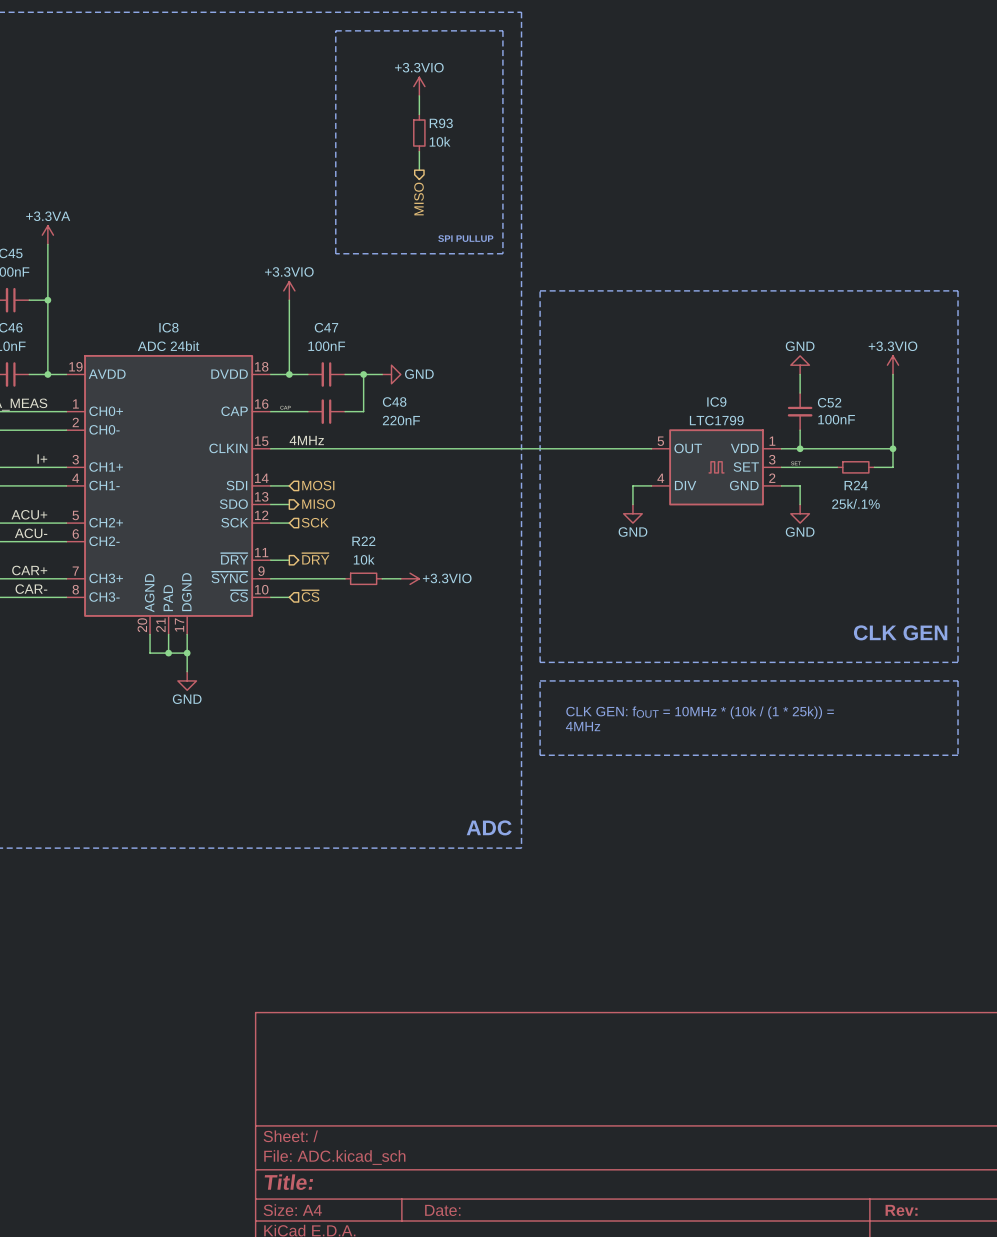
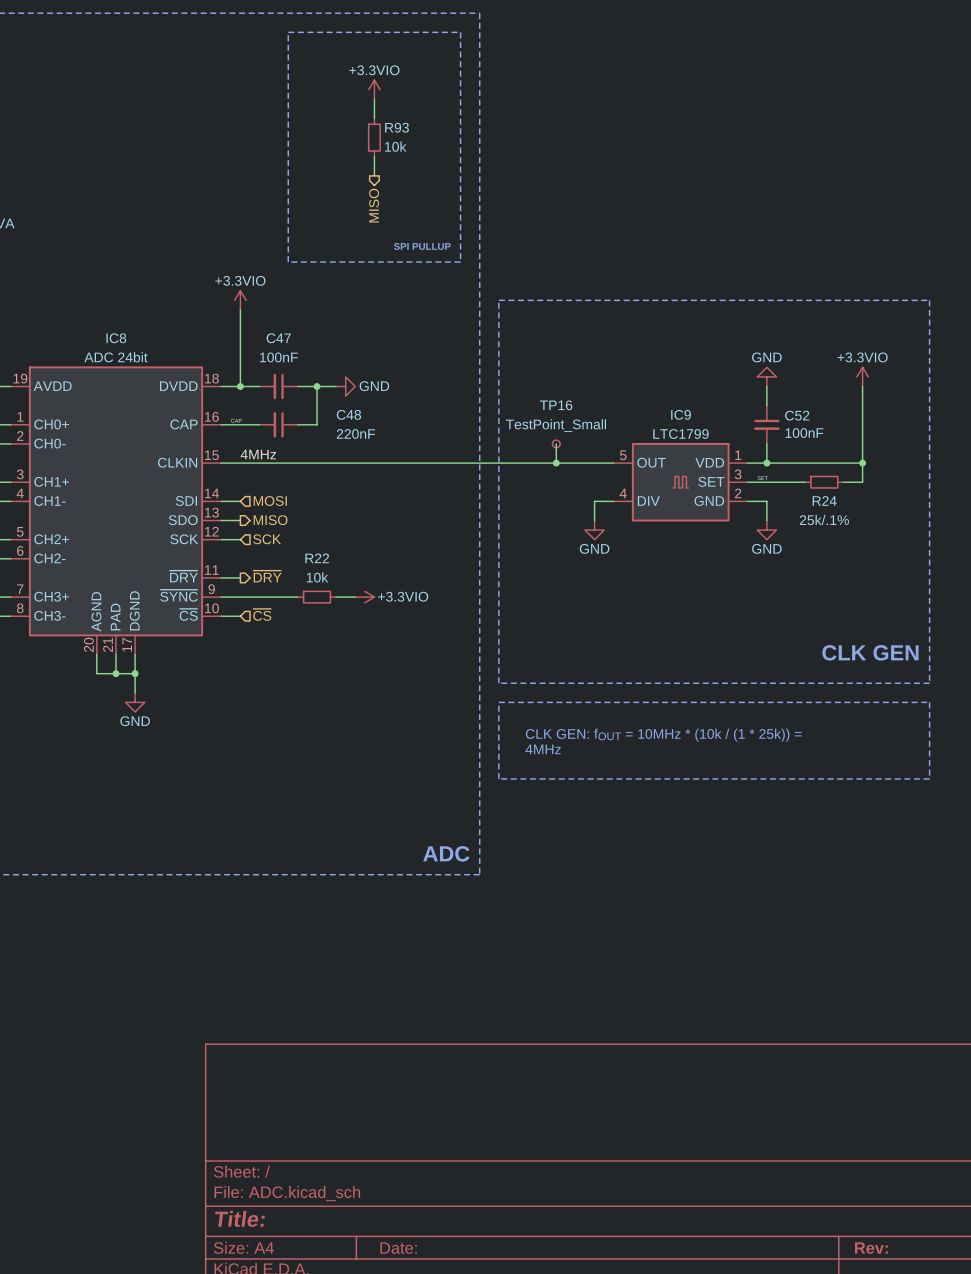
wire: none -> (556, 443) (556, 463)
TP16: none -> TestPoint_Small (556, 443)
junction: none -> (556, 463)

